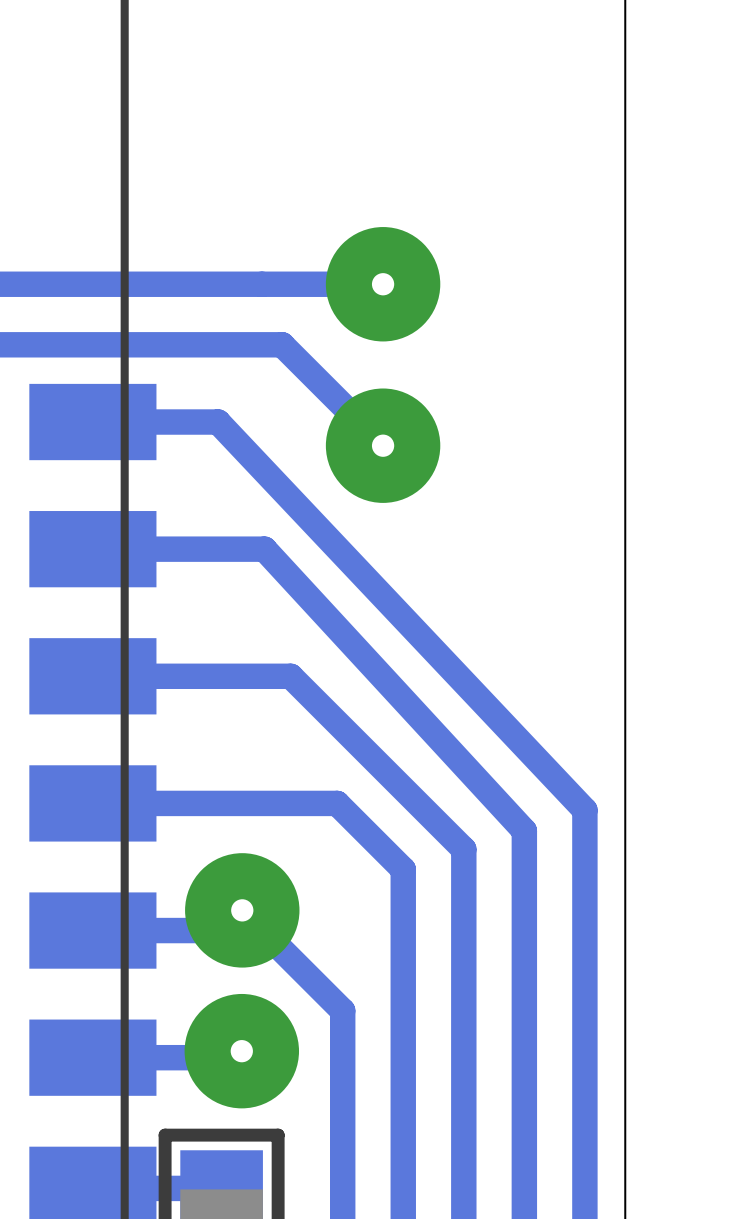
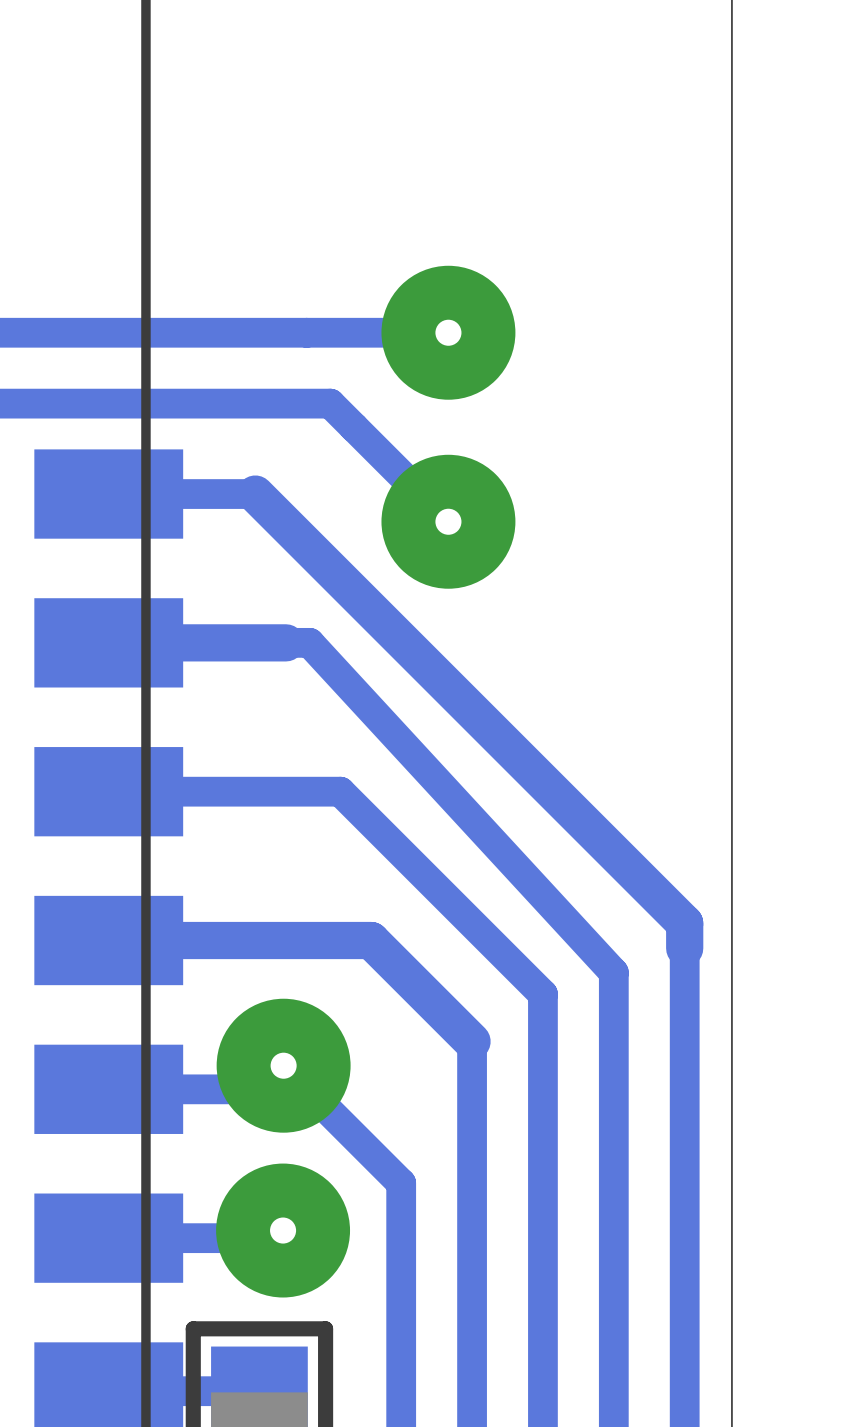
track: (218, 422) (584, 810) -> (255, 494) (684, 923) (684, 948)
track width: thin (244, 549) (92, 549) -> thick (286, 642) (108, 642)
track: (316, 803) (337, 803) (403, 869) (403, 889) -> (371, 940) (472, 1041)
track width: thin (316, 803) (92, 803) -> thick (371, 940) (108, 940)

